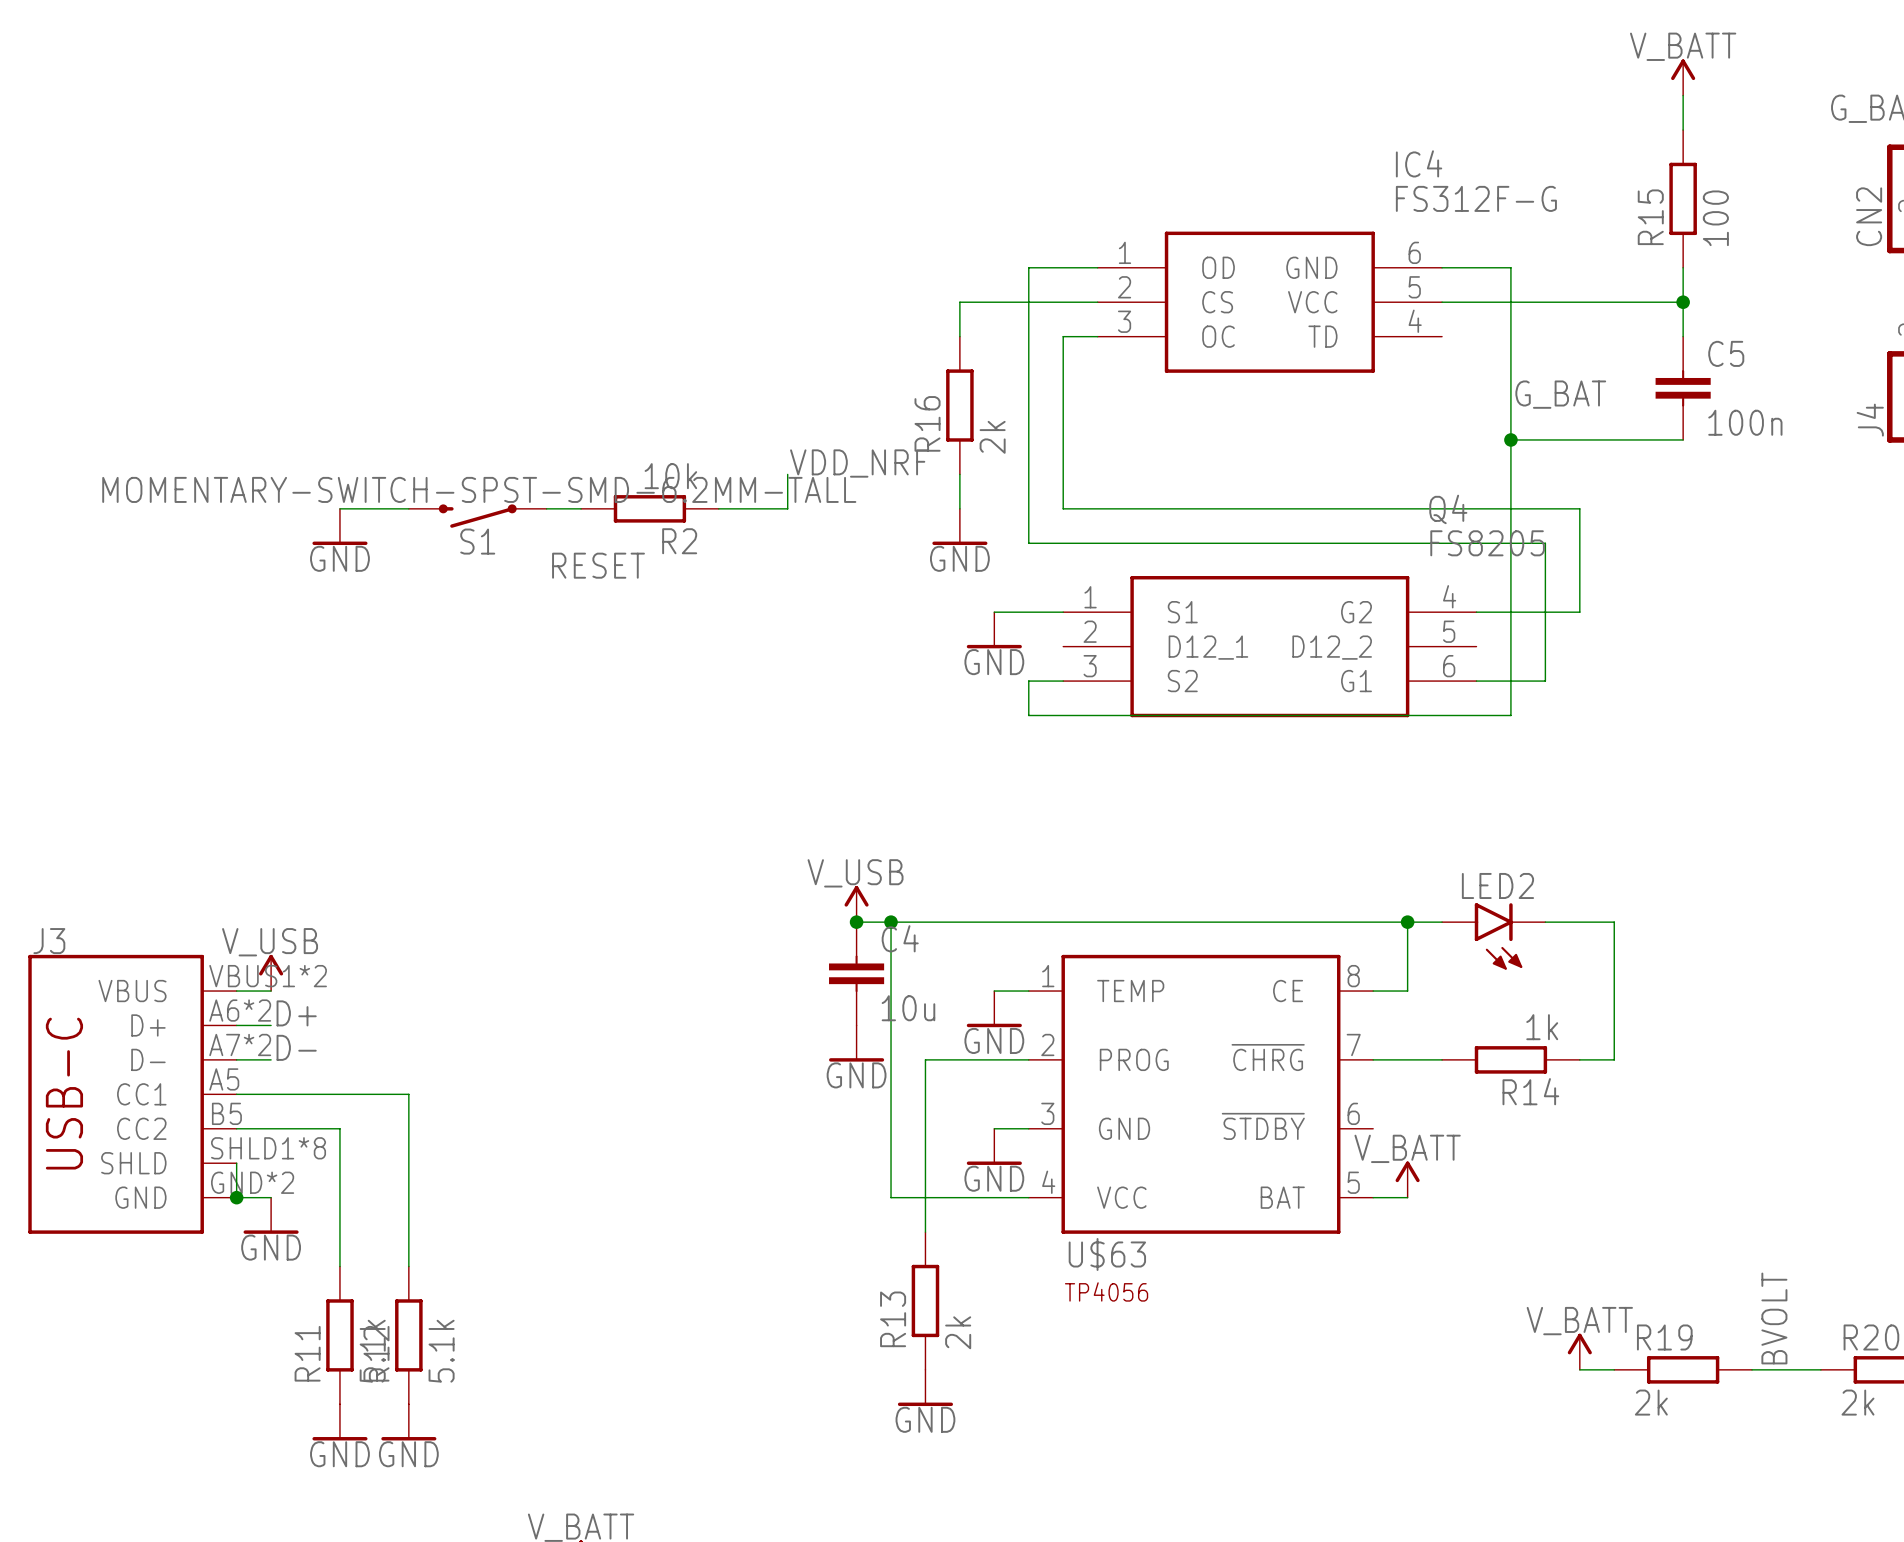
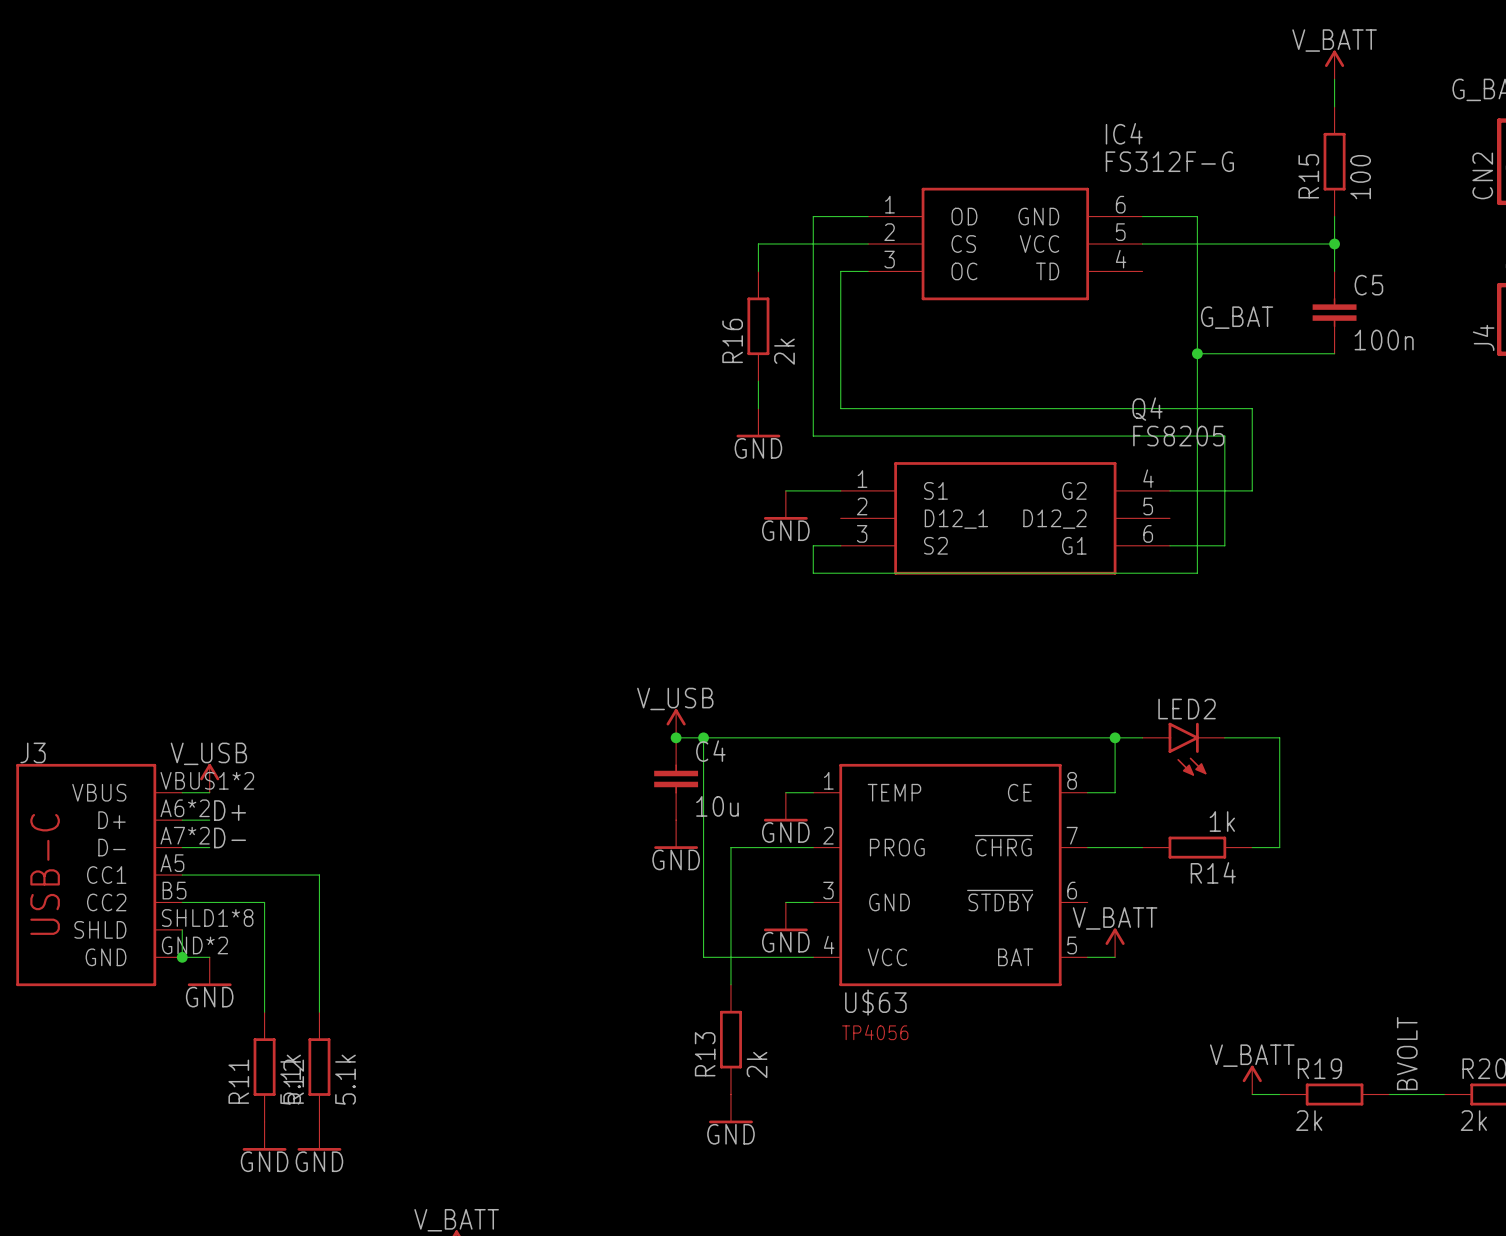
label: VDD_NRF (859, 463) -> none
wire: (787, 474) (787, 508) (718, 508) -> none
wire: (339, 508) (408, 508) -> none
wire: (546, 508) (581, 508) -> none
R2: 10k (649, 508) -> none
S1: MOMENTARY-SWITCH-SPST-SMD-6.2MM-TALL (477, 516) -> none
power symbol: GND (339, 526) -> none
label: RESET (598, 565) -> none

